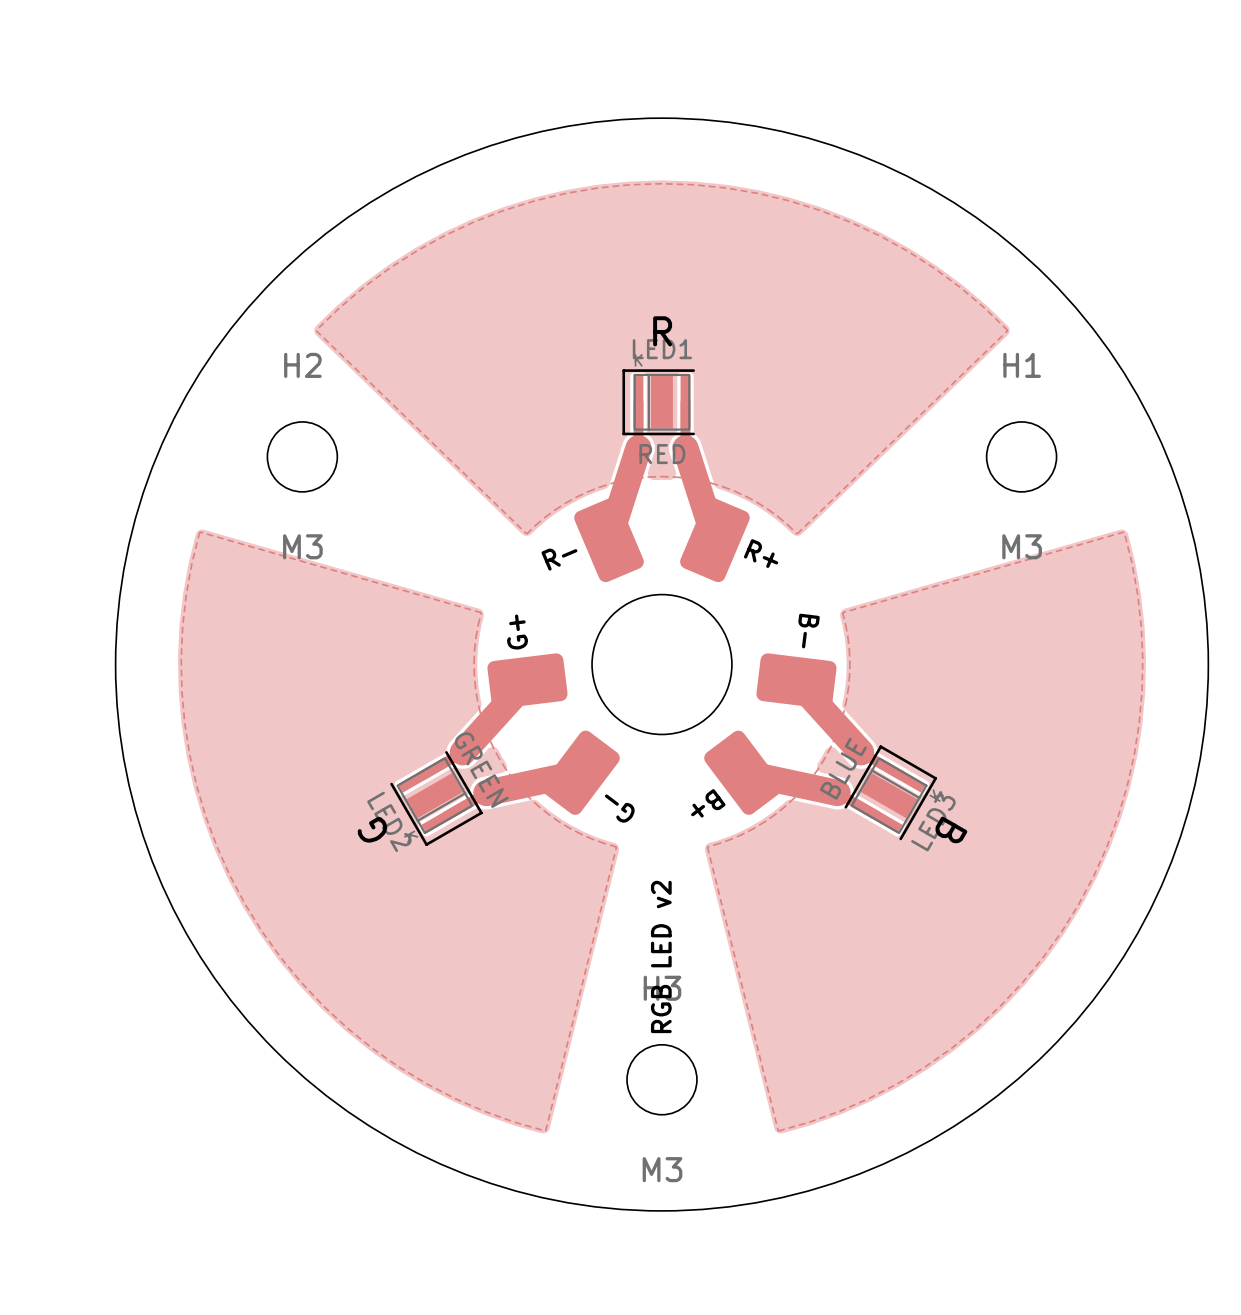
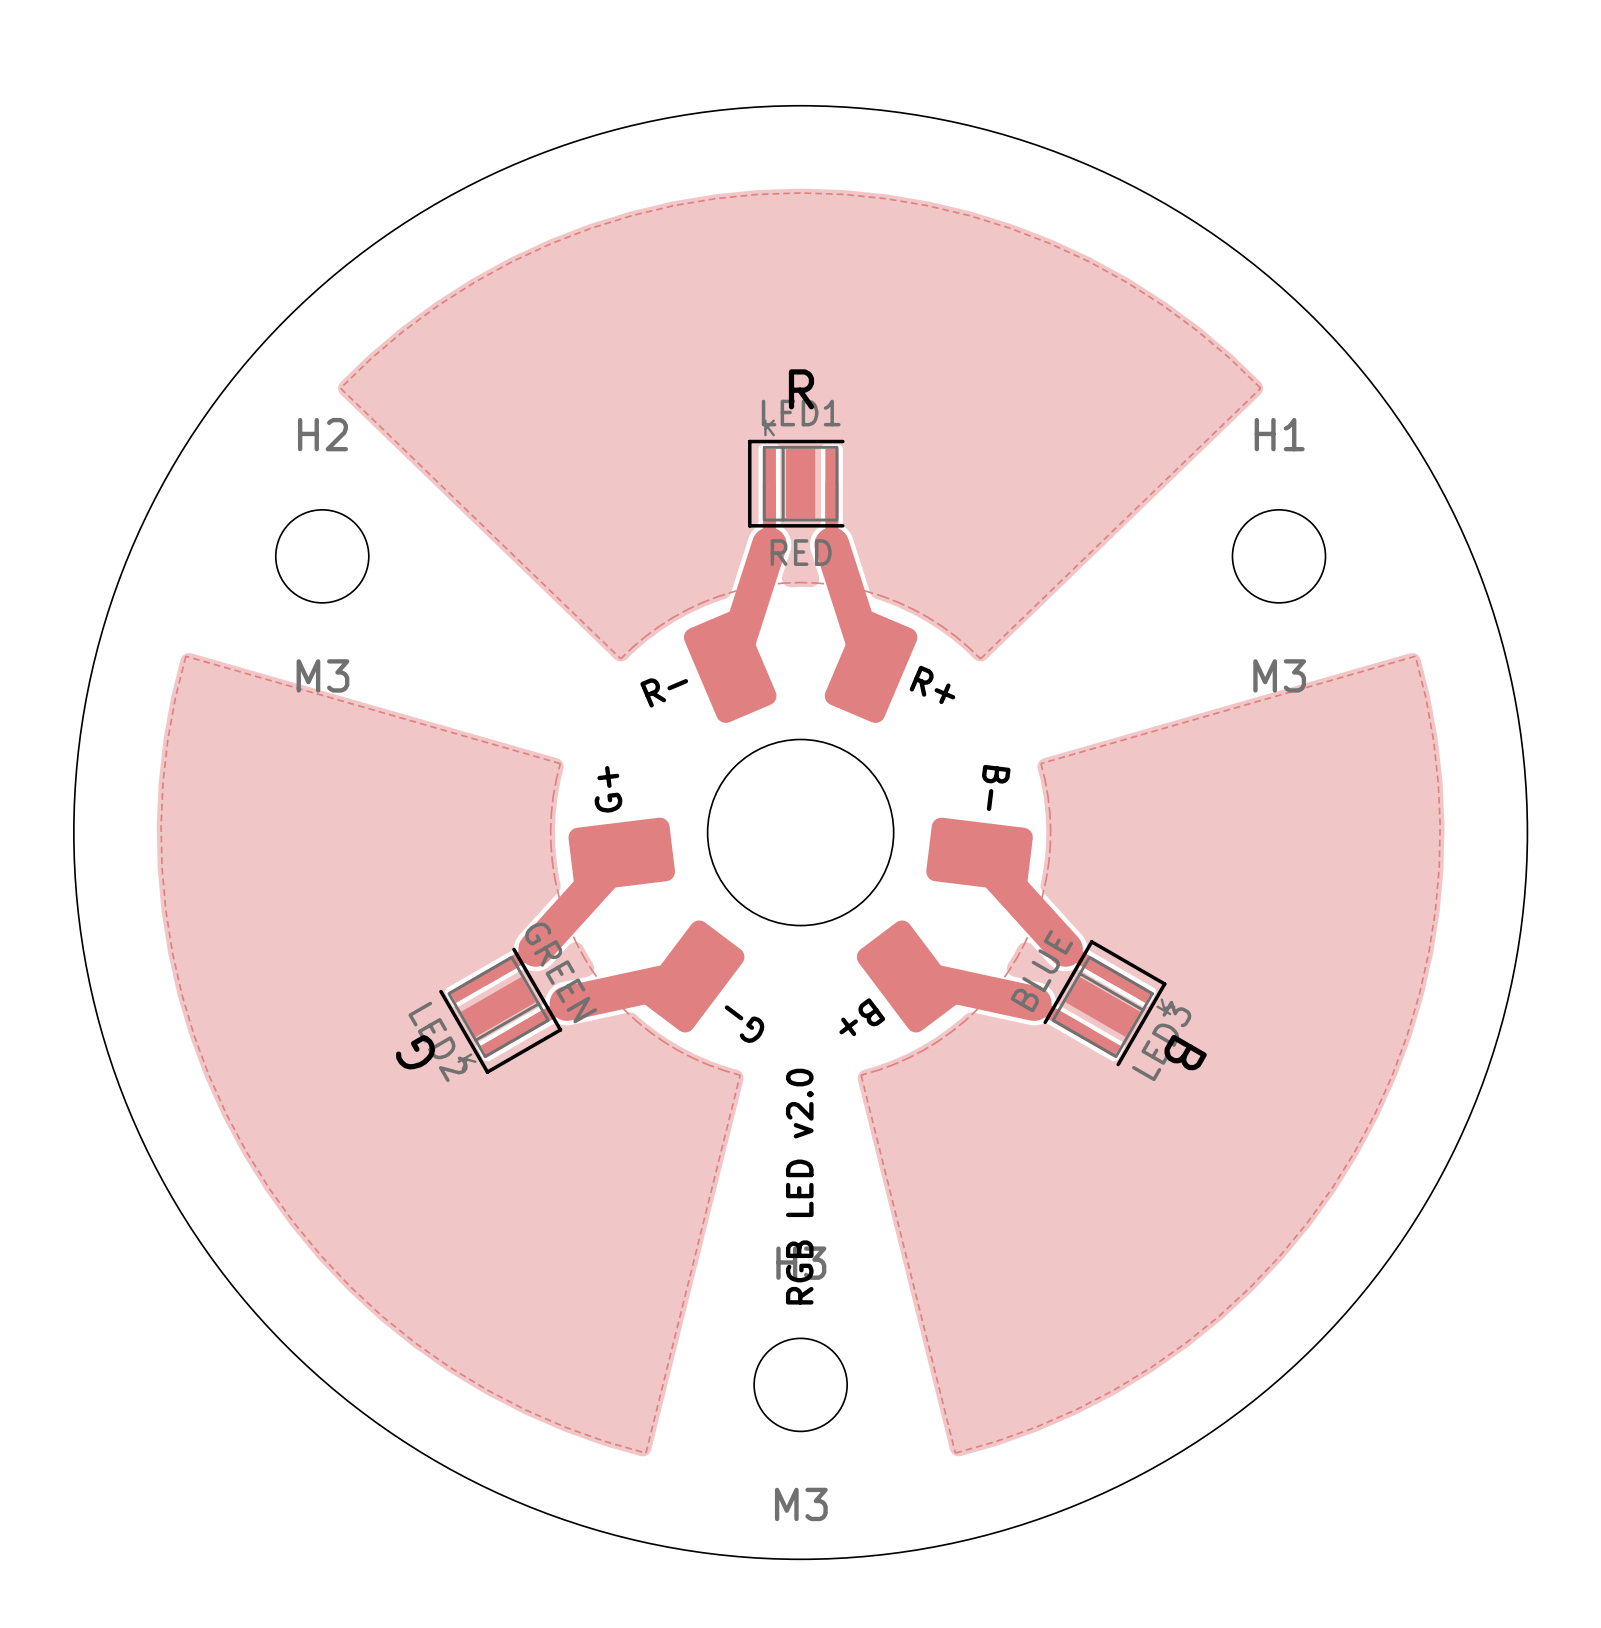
text: RGB LED v2 (661, 956) -> RGB LED v2.0 (799, 1186)

